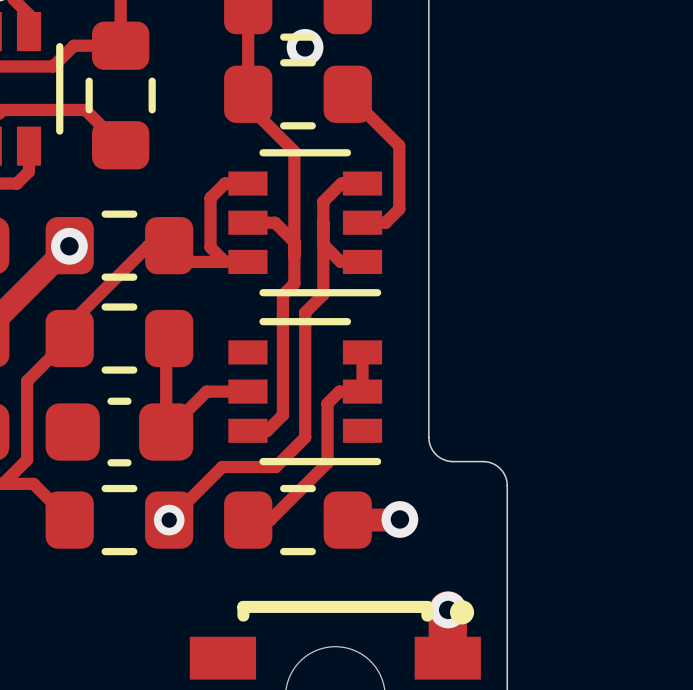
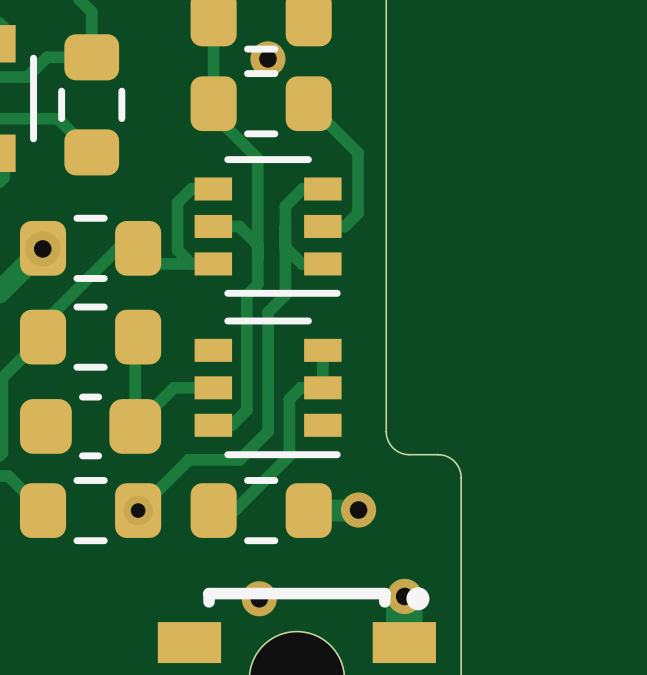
via: none -> (259, 598)

